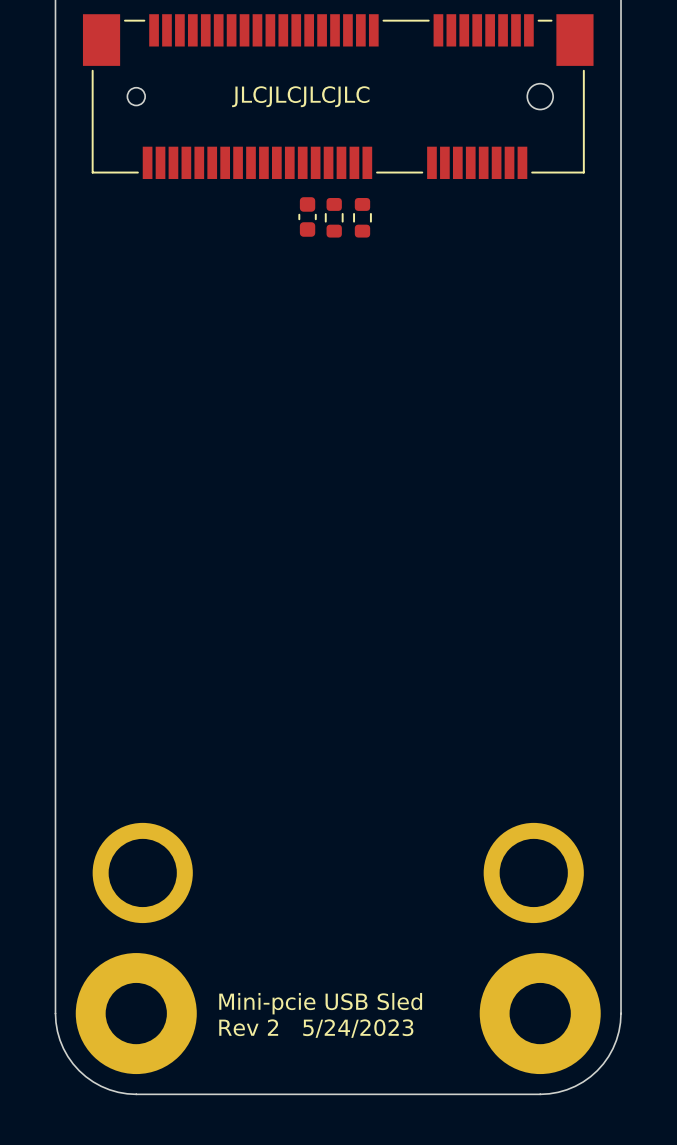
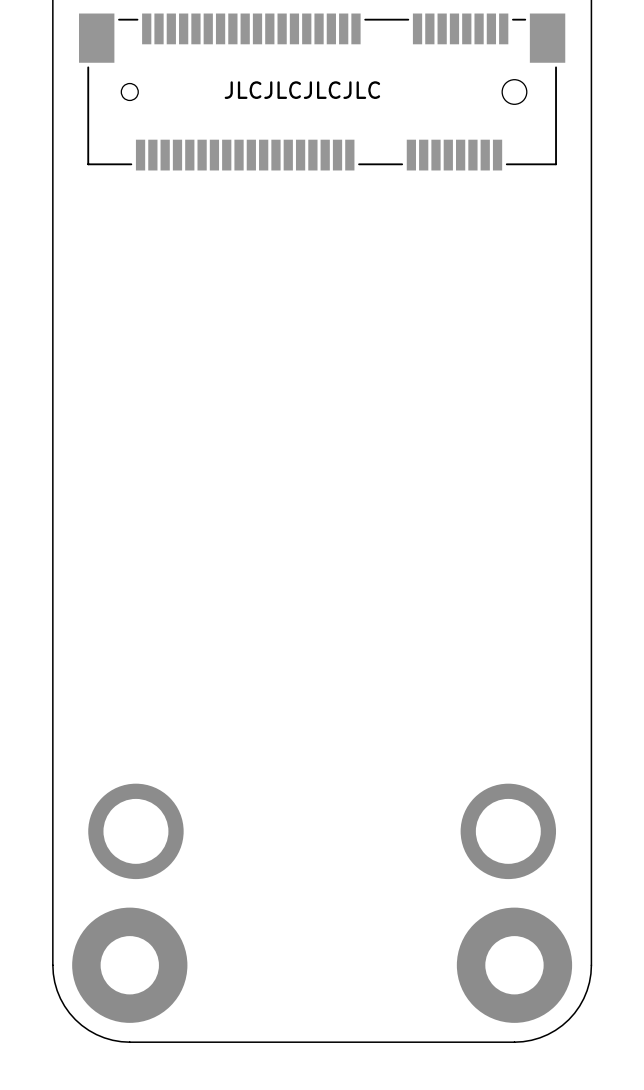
part: (307, 216) -> none
part: (334, 217) -> none
part: (362, 217) -> none
text: Mini-pcie USB Sled (320, 1003) -> none
text: Rev 2 5/24/2023 (316, 1028) -> none

